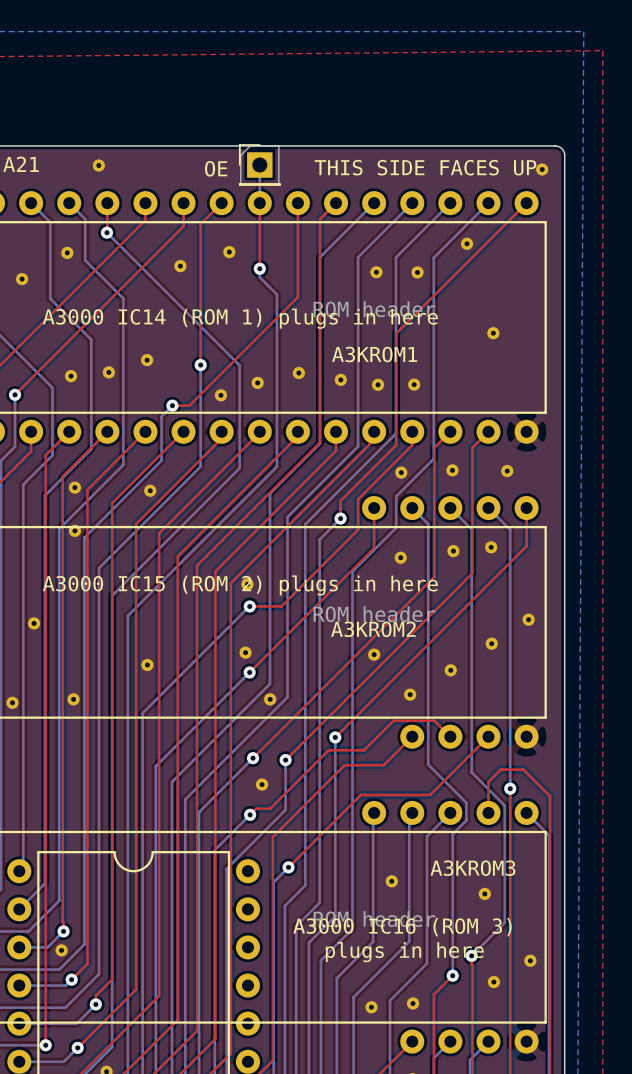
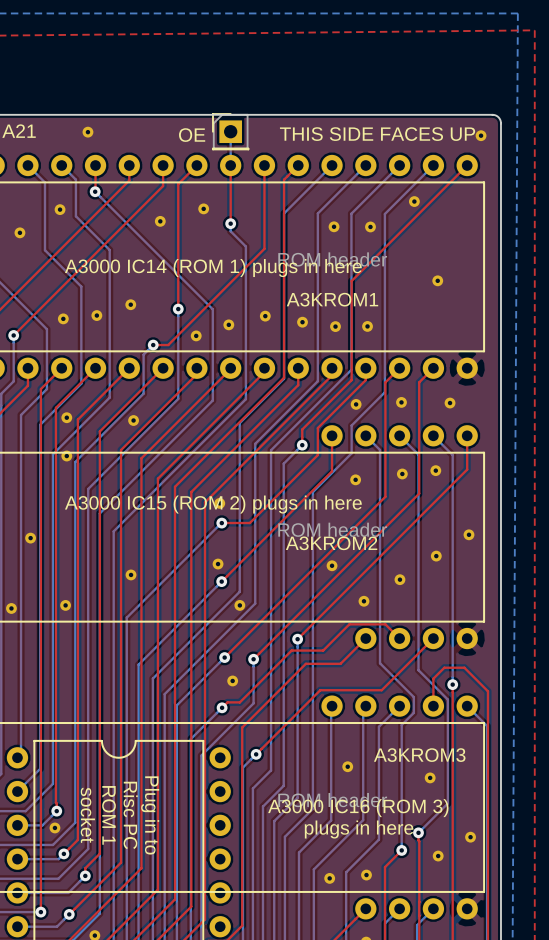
text: none -> socket (87, 815)
text: none -> ROM 1 (108, 815)
text: none -> Risc PC (130, 815)
text: none -> Plug in to (150, 815)

